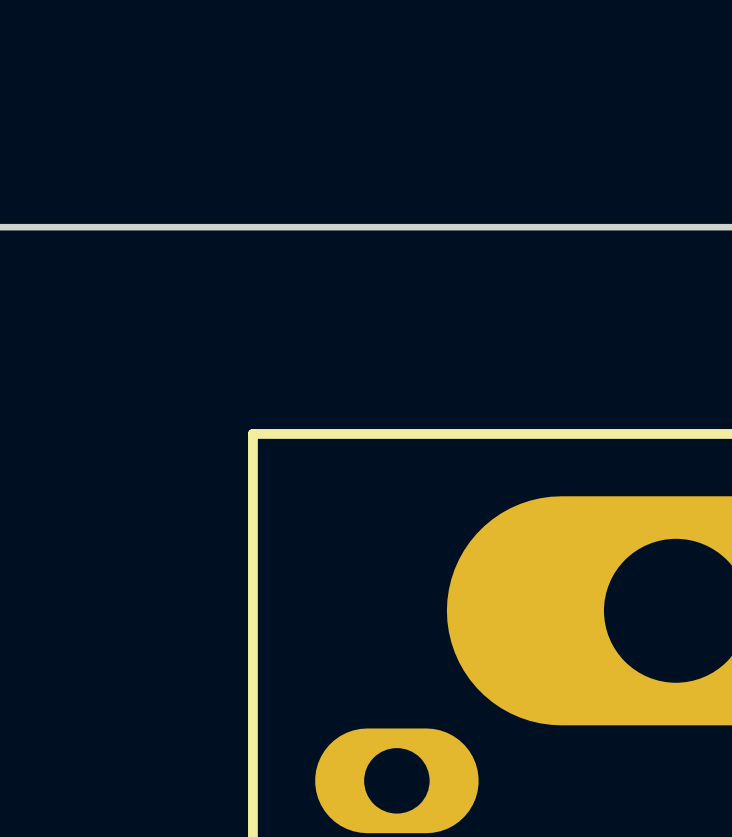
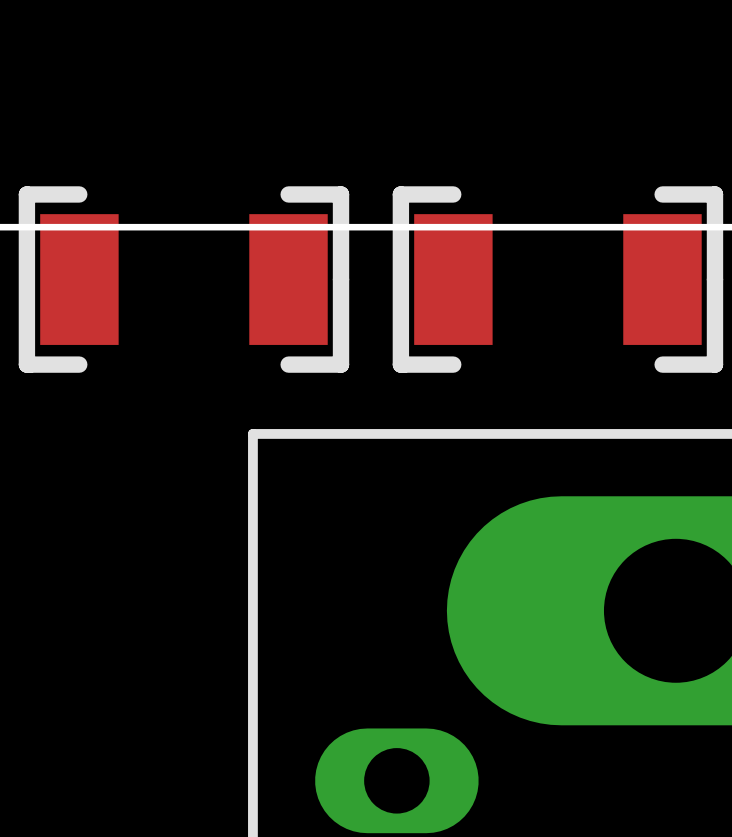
part: none -> (183, 279)
part: none -> (557, 279)

